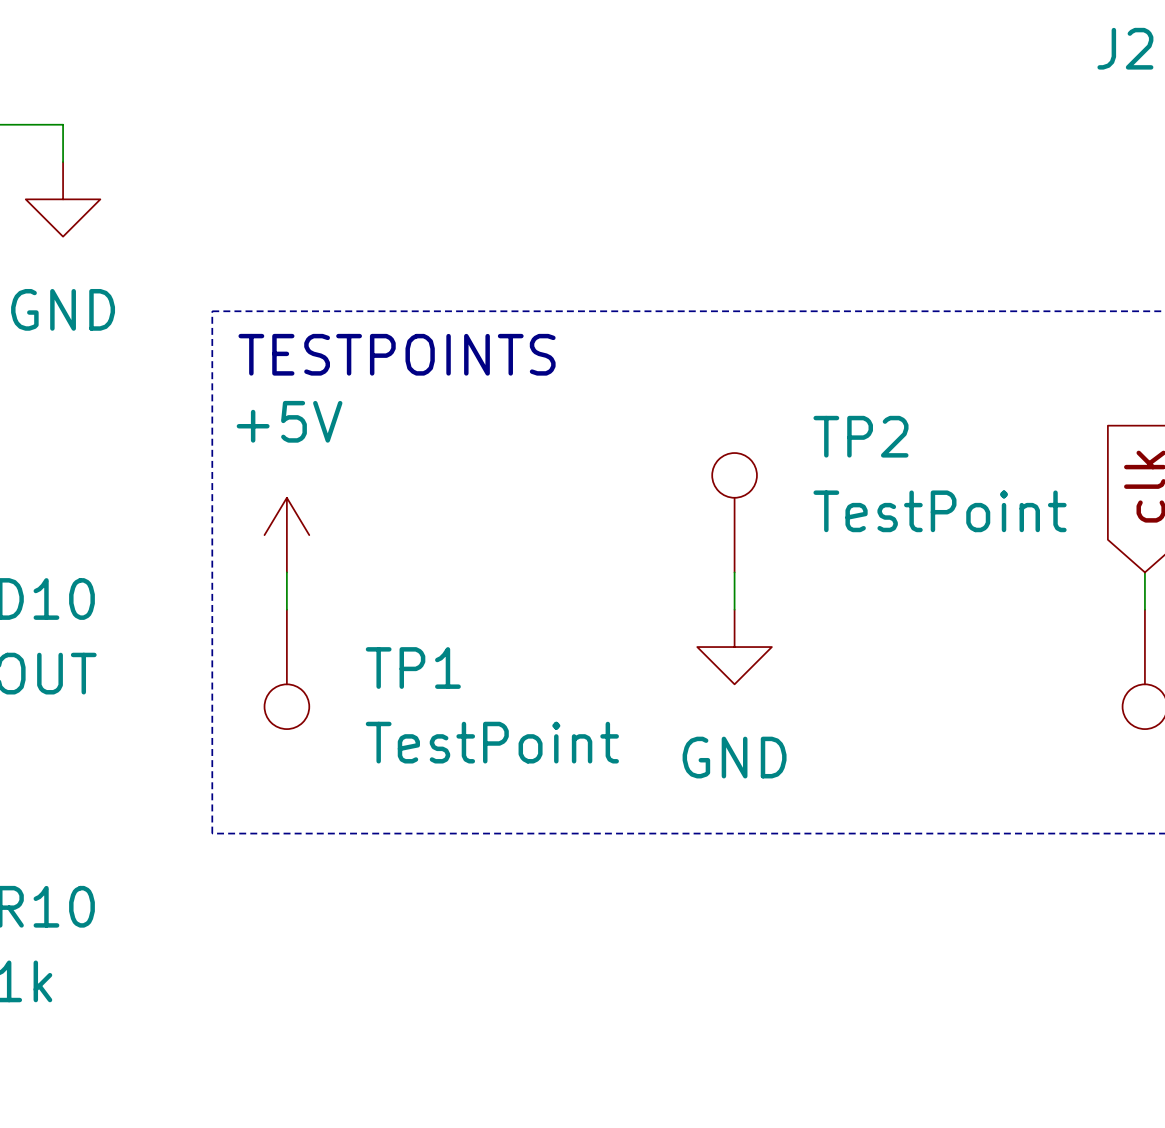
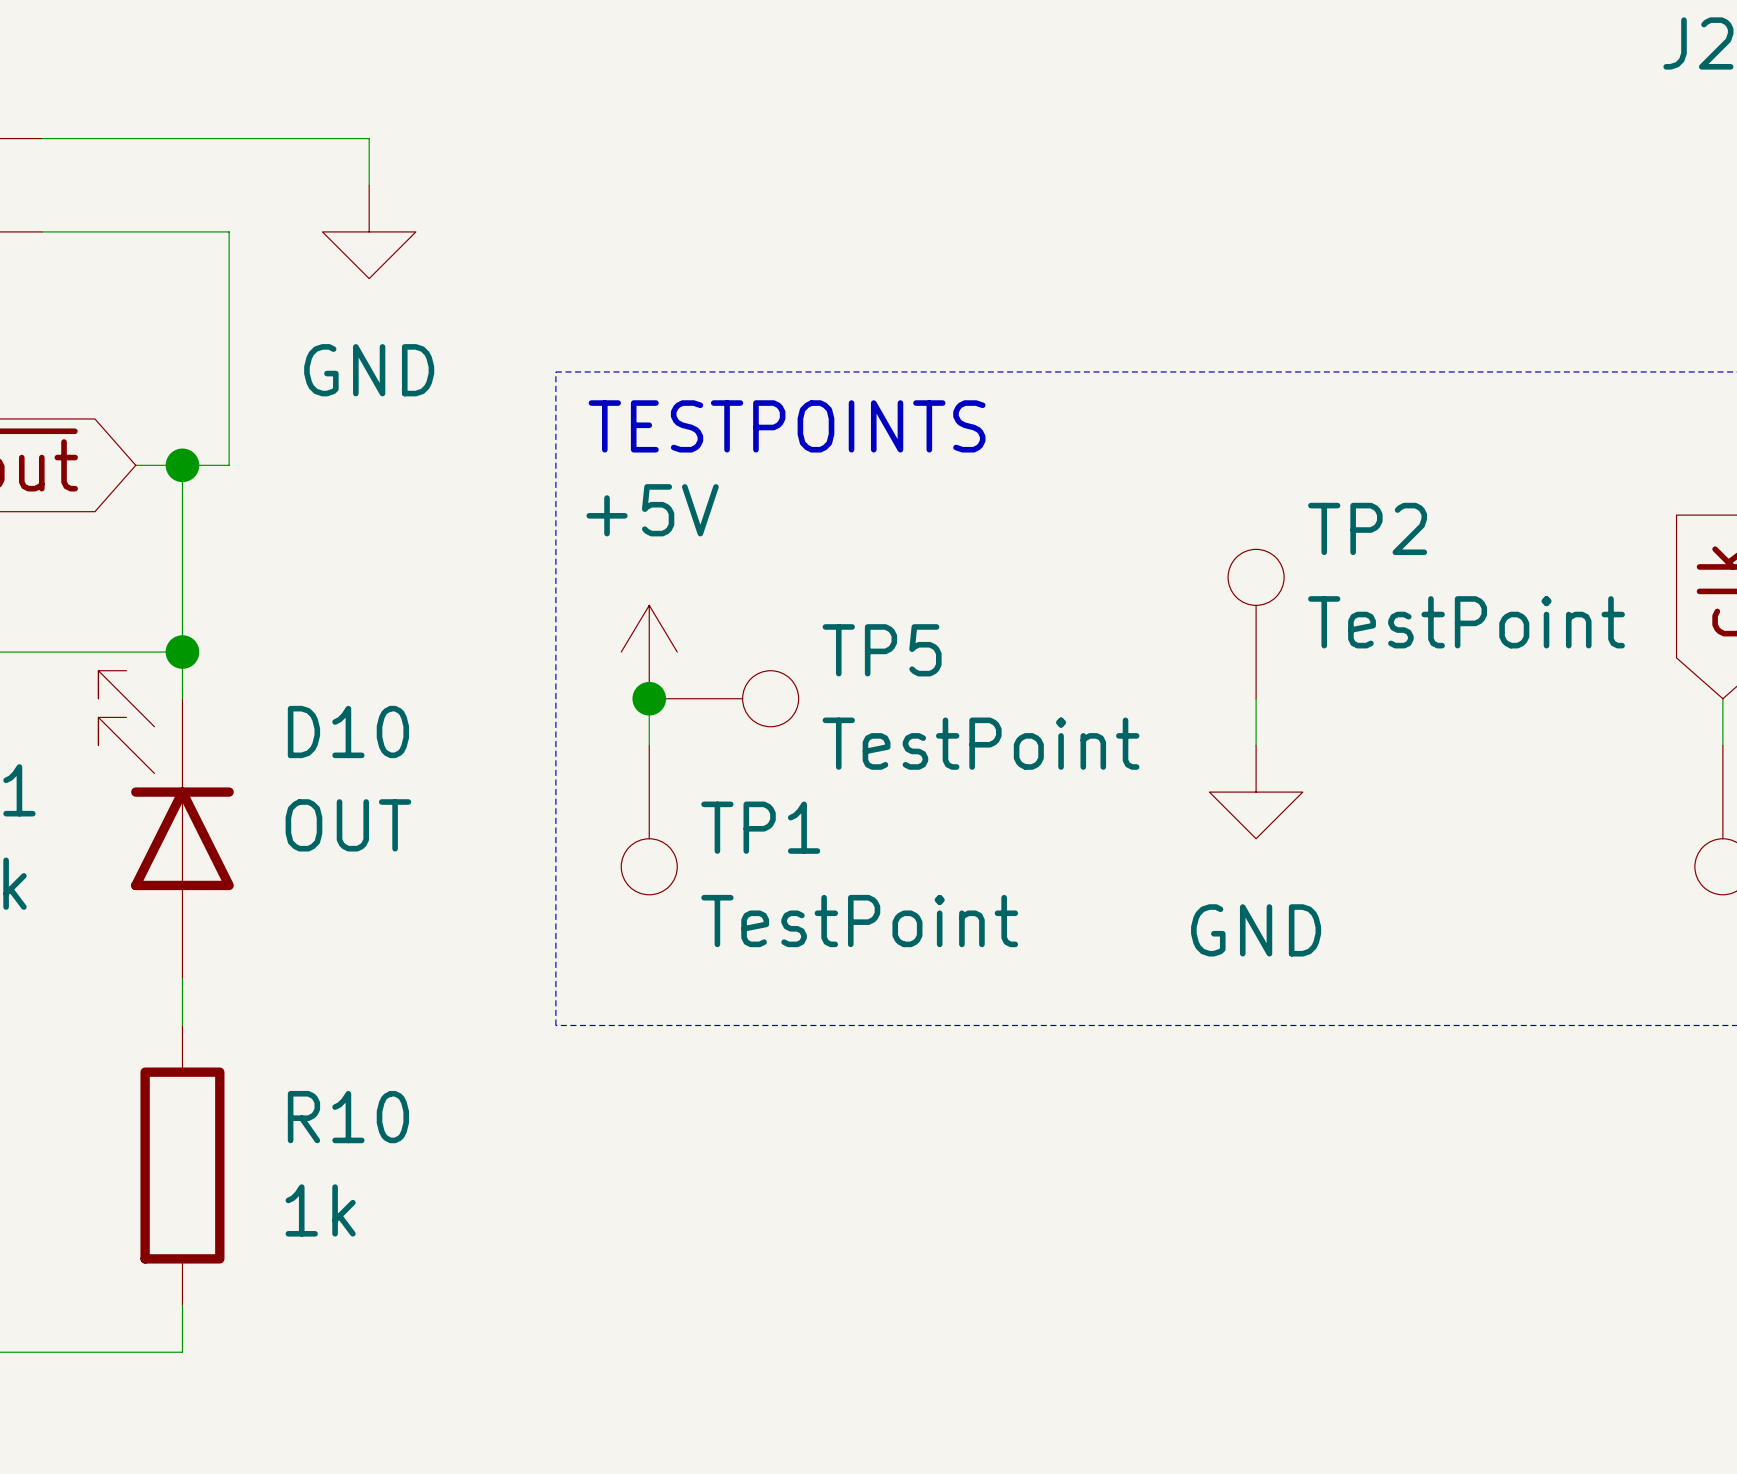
TP2 position: (734, 512) -> (1256, 624)
junction: none -> (649, 698)
TP5: none -> TestPoint (723, 698)
wire: (734, 572) (734, 609) -> (1256, 698) (1256, 745)
power symbol position: GND (734, 647) -> GND (1256, 792)
TP1 name position: TP1 (413, 668) -> TP1 (760, 827)
TP1 value position: TestPoint (492, 742) -> TestPoint (859, 921)

